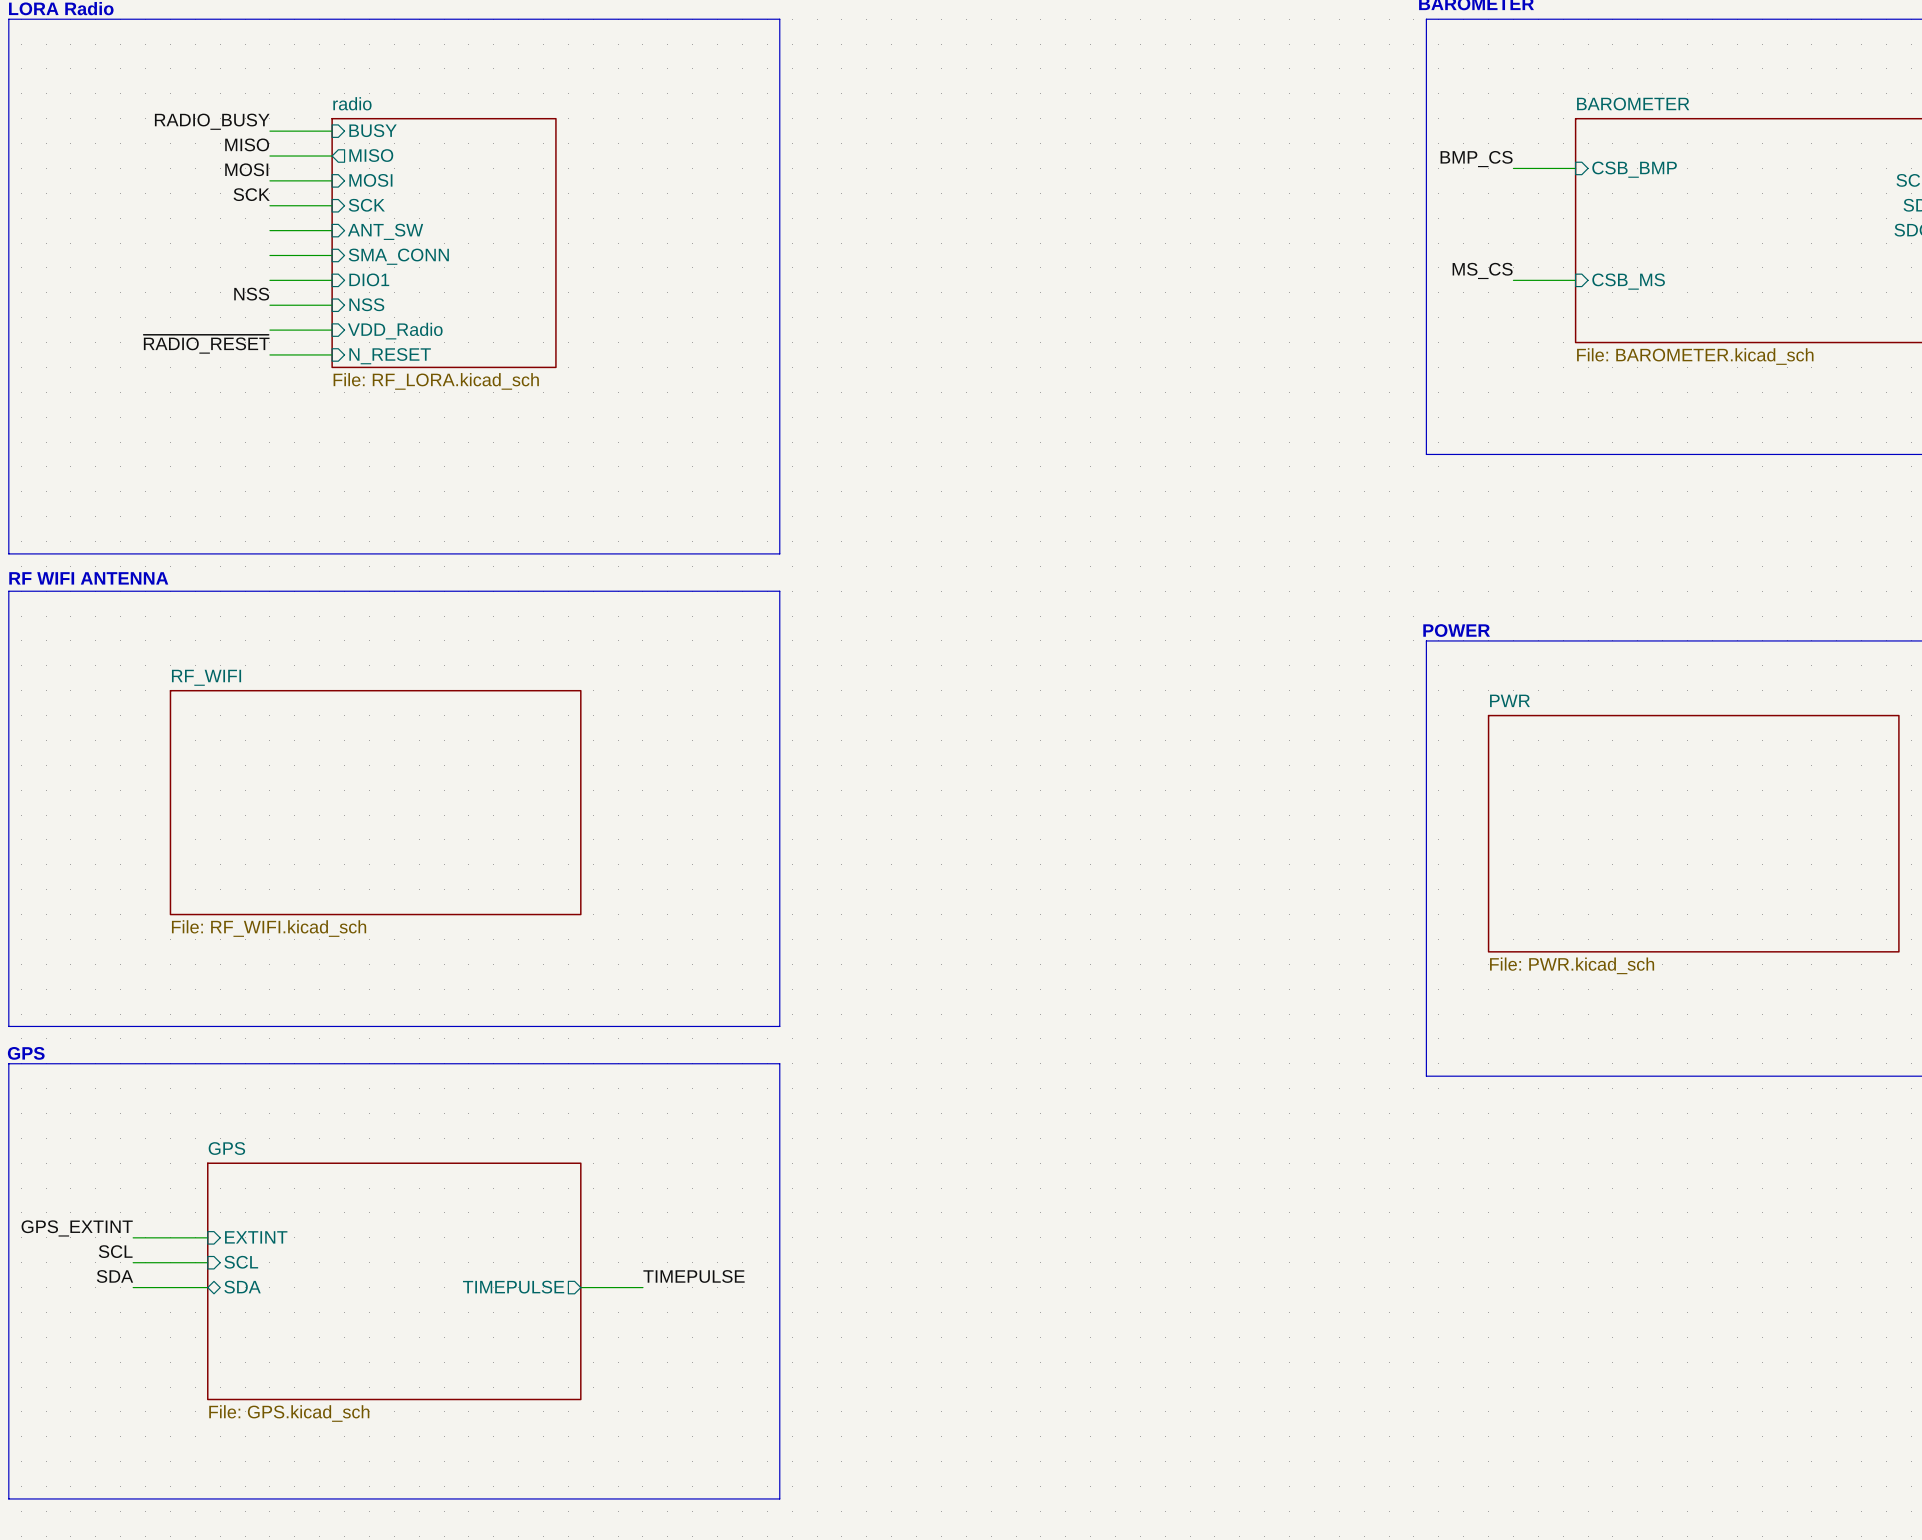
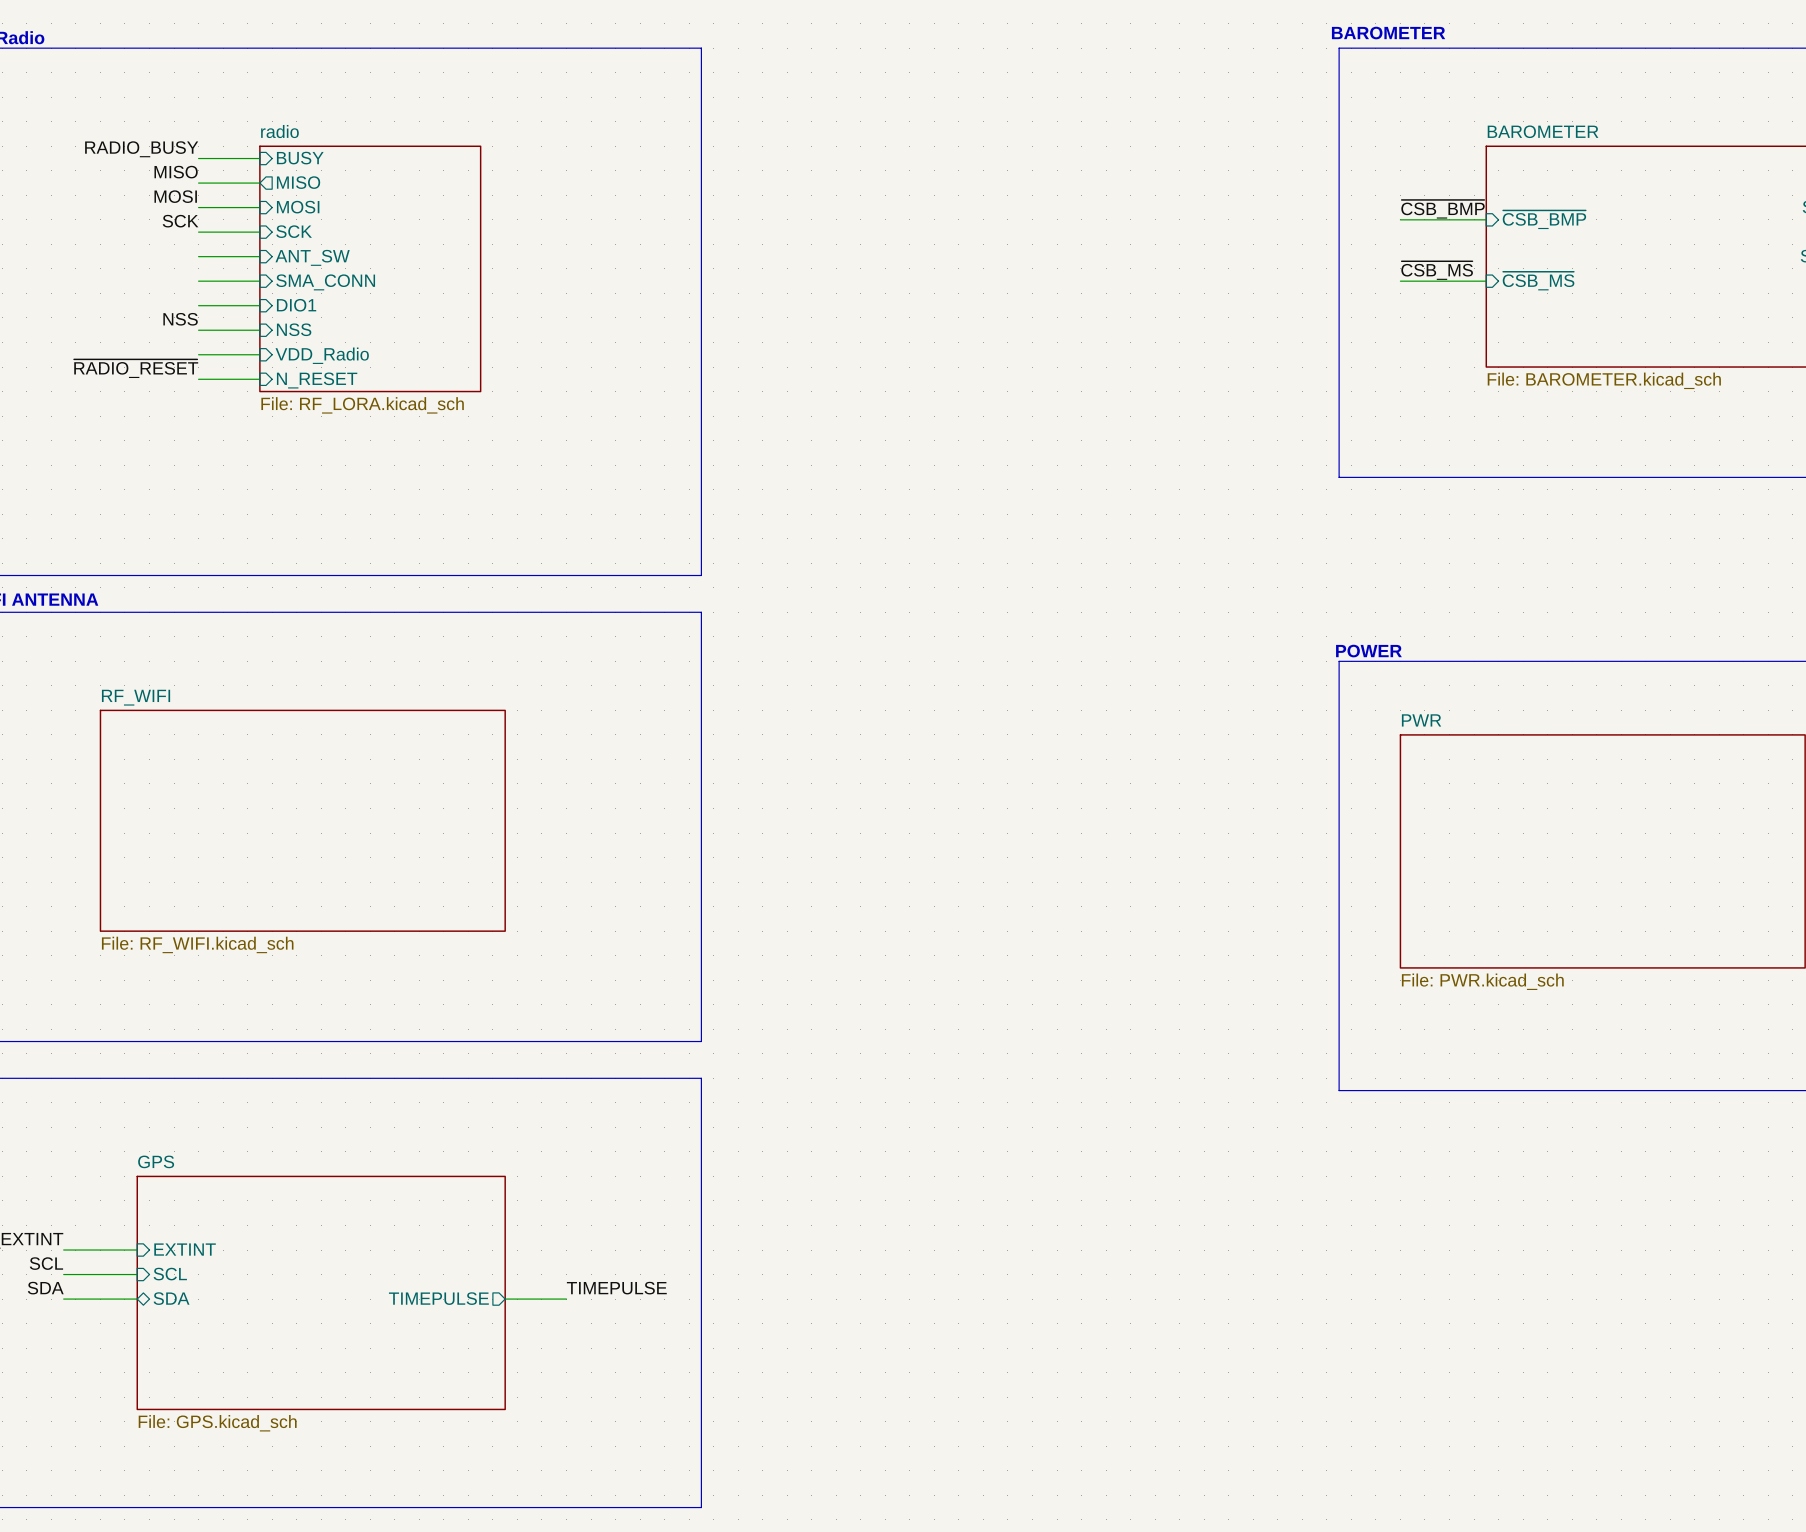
label: BMP_CS (1476, 159) -> none
wire: (1513, 168) (1575, 168) -> none
sheet pin: CSB_BMP (1634, 169) -> ~{CSB_BMP} (1544, 219)
label: none -> ~{CSB_BMP} (1443, 209)
wire: none -> (1400, 219) (1486, 219)
label: none -> ~{CSB_MS} (1437, 270)
wire: none -> (1400, 281) (1486, 281)
label: MS_CS (1482, 270) -> none
wire: (1513, 280) (1575, 280) -> none
sheet pin: CSB_MS (1628, 281) -> ~{CSB_MS} (1538, 281)

